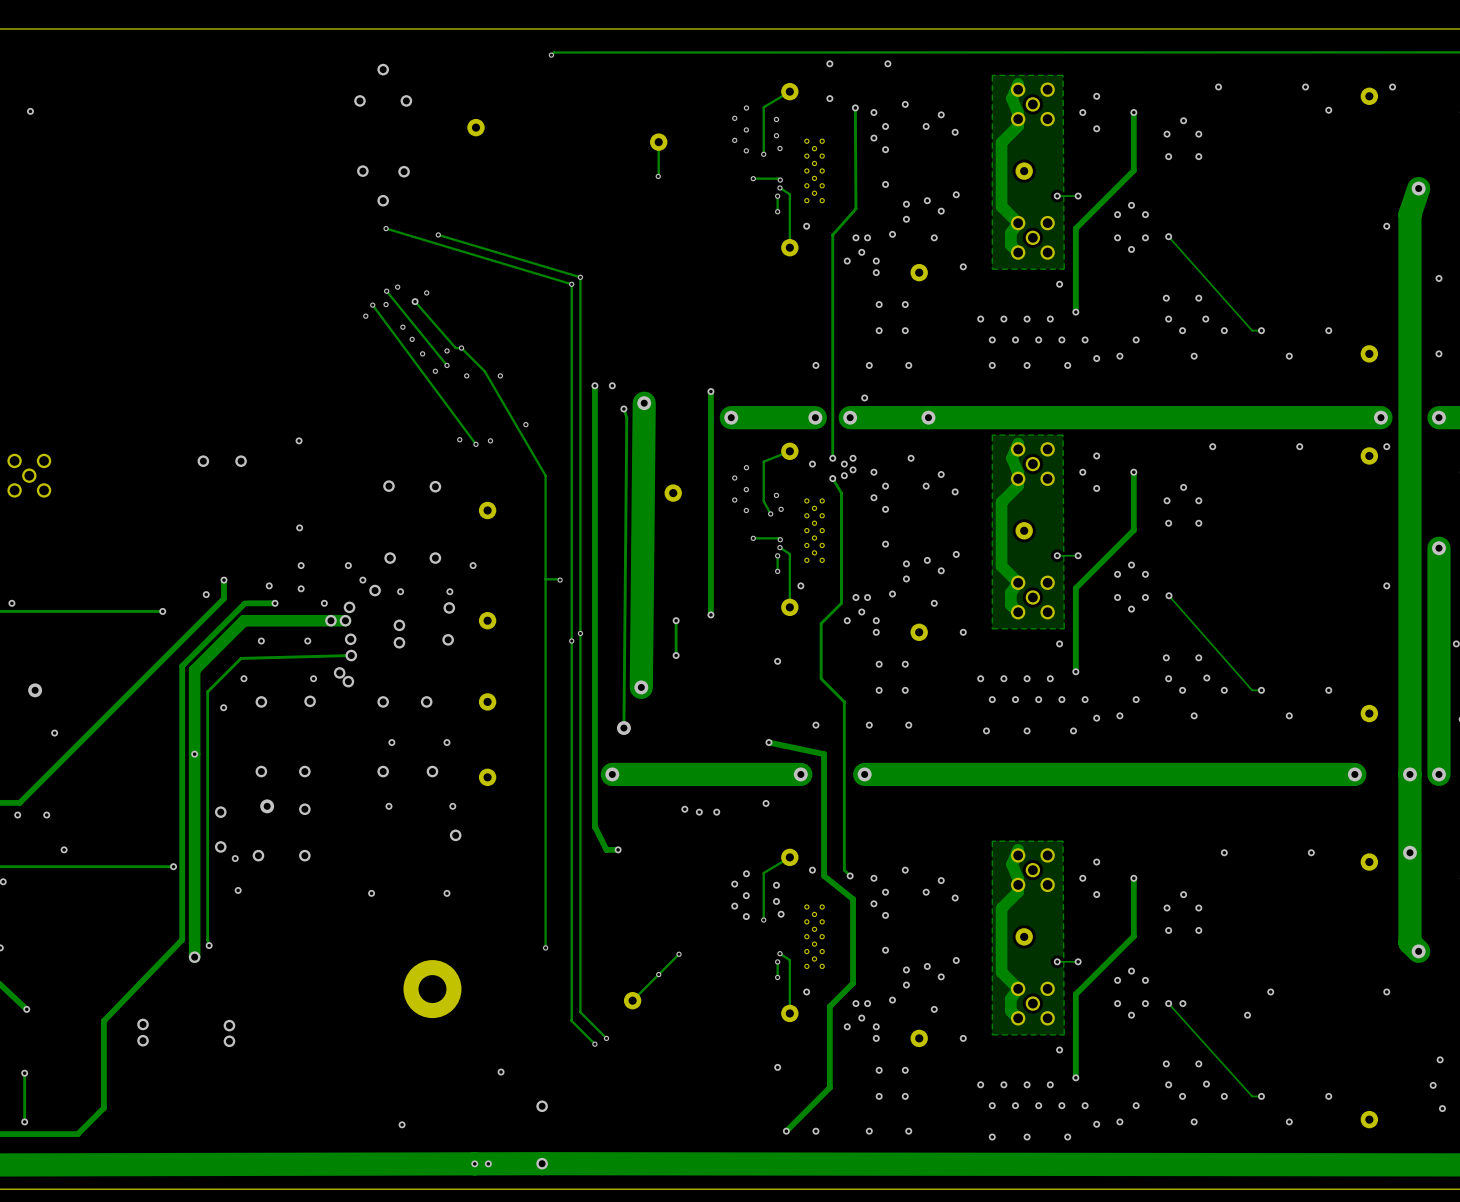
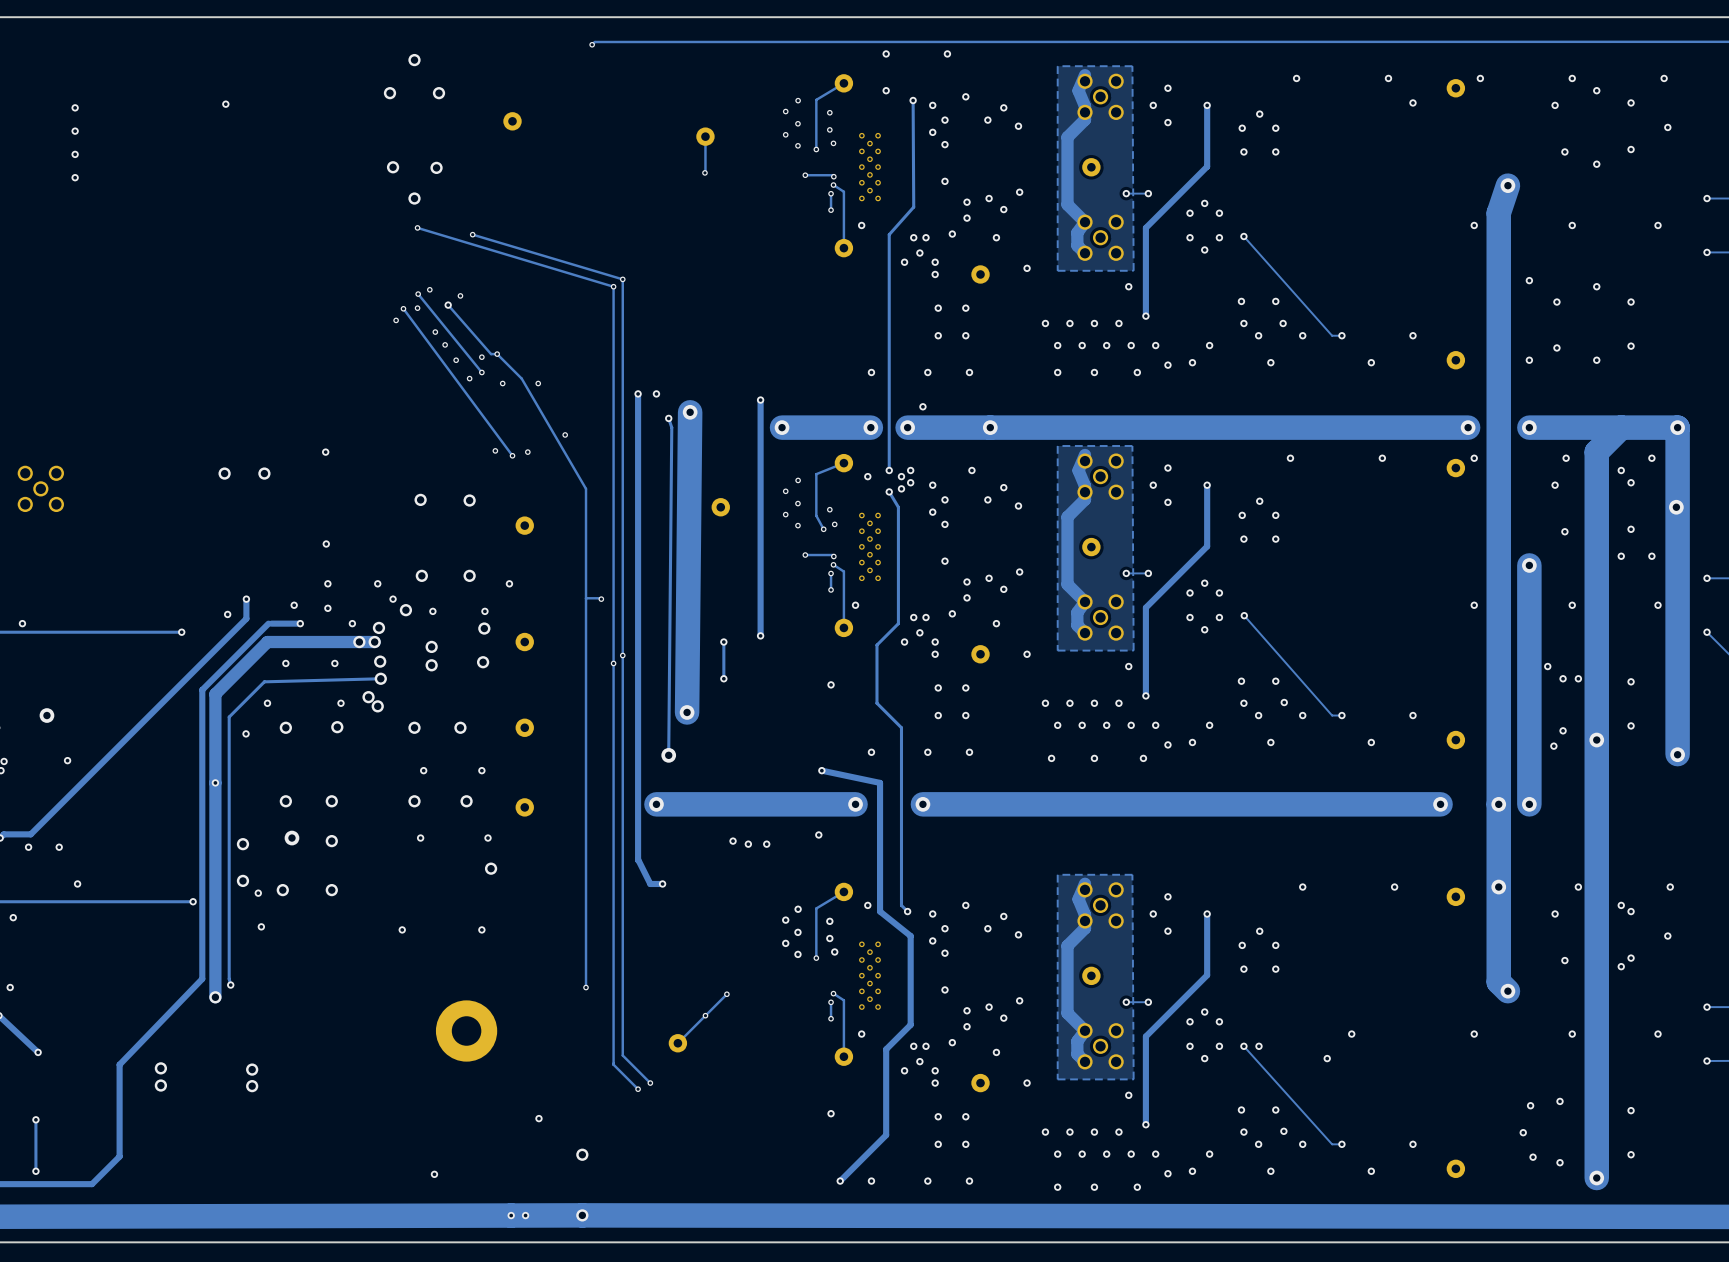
via: (30, 111) -> none
via: none -> (225, 104)
via: none -> (75, 107)
via: none -> (75, 131)
via: none -> (75, 154)
via: none -> (75, 177)

